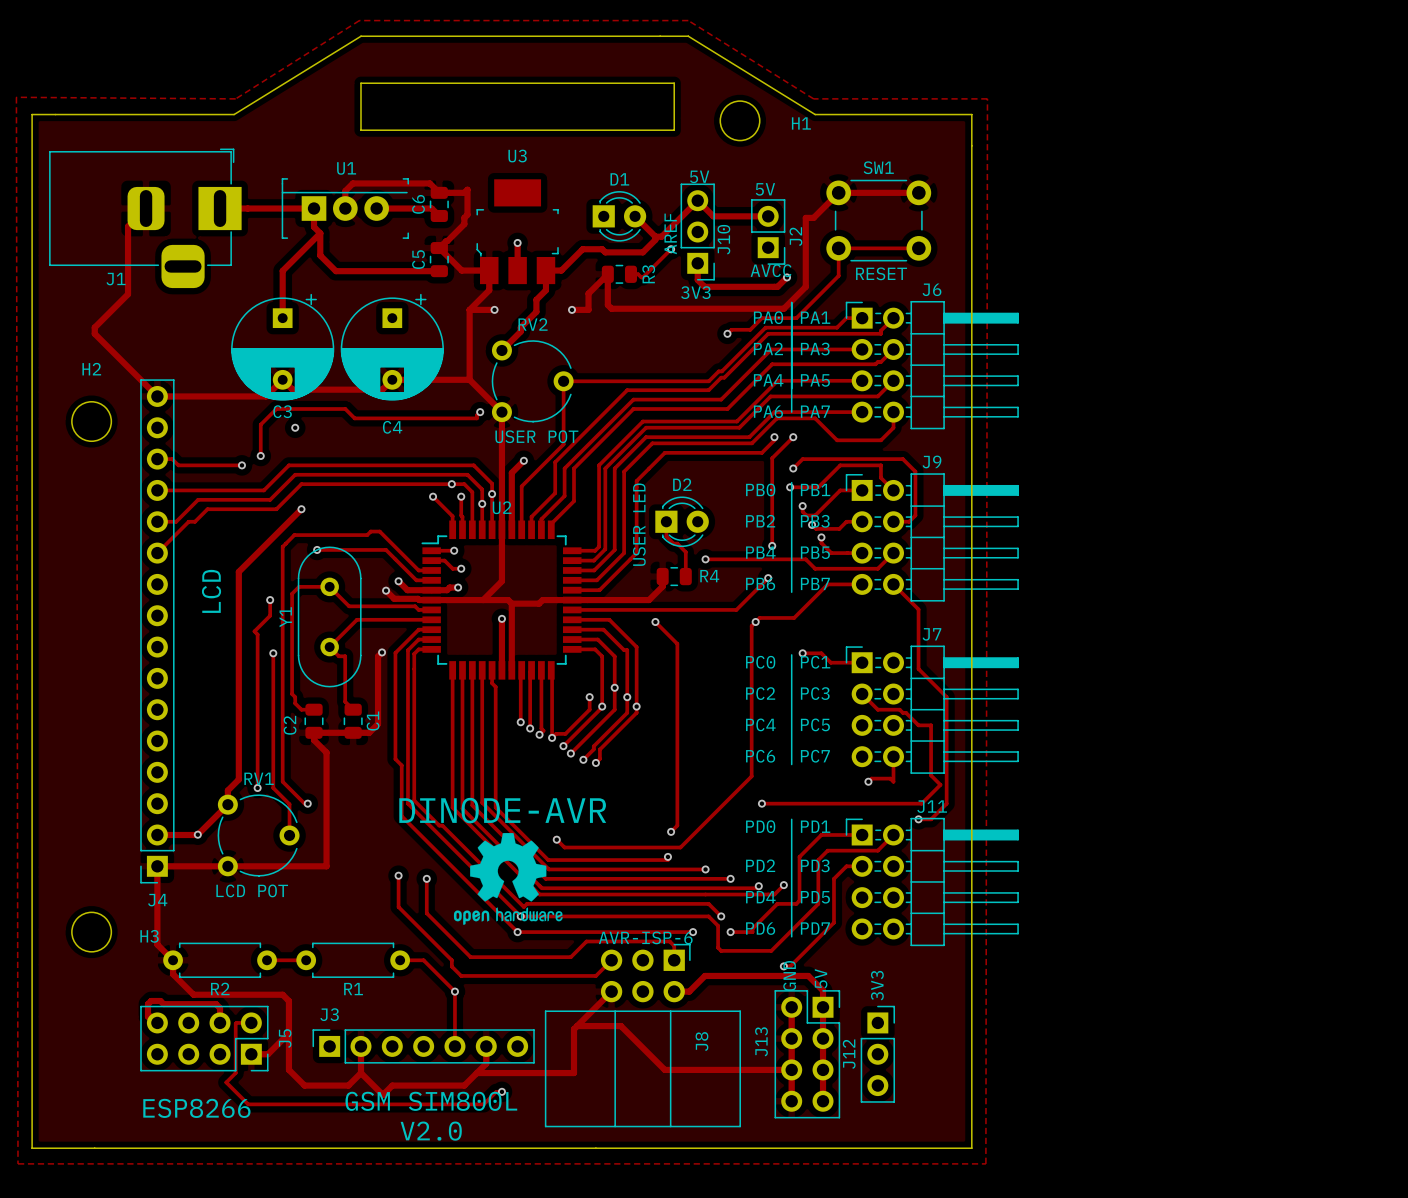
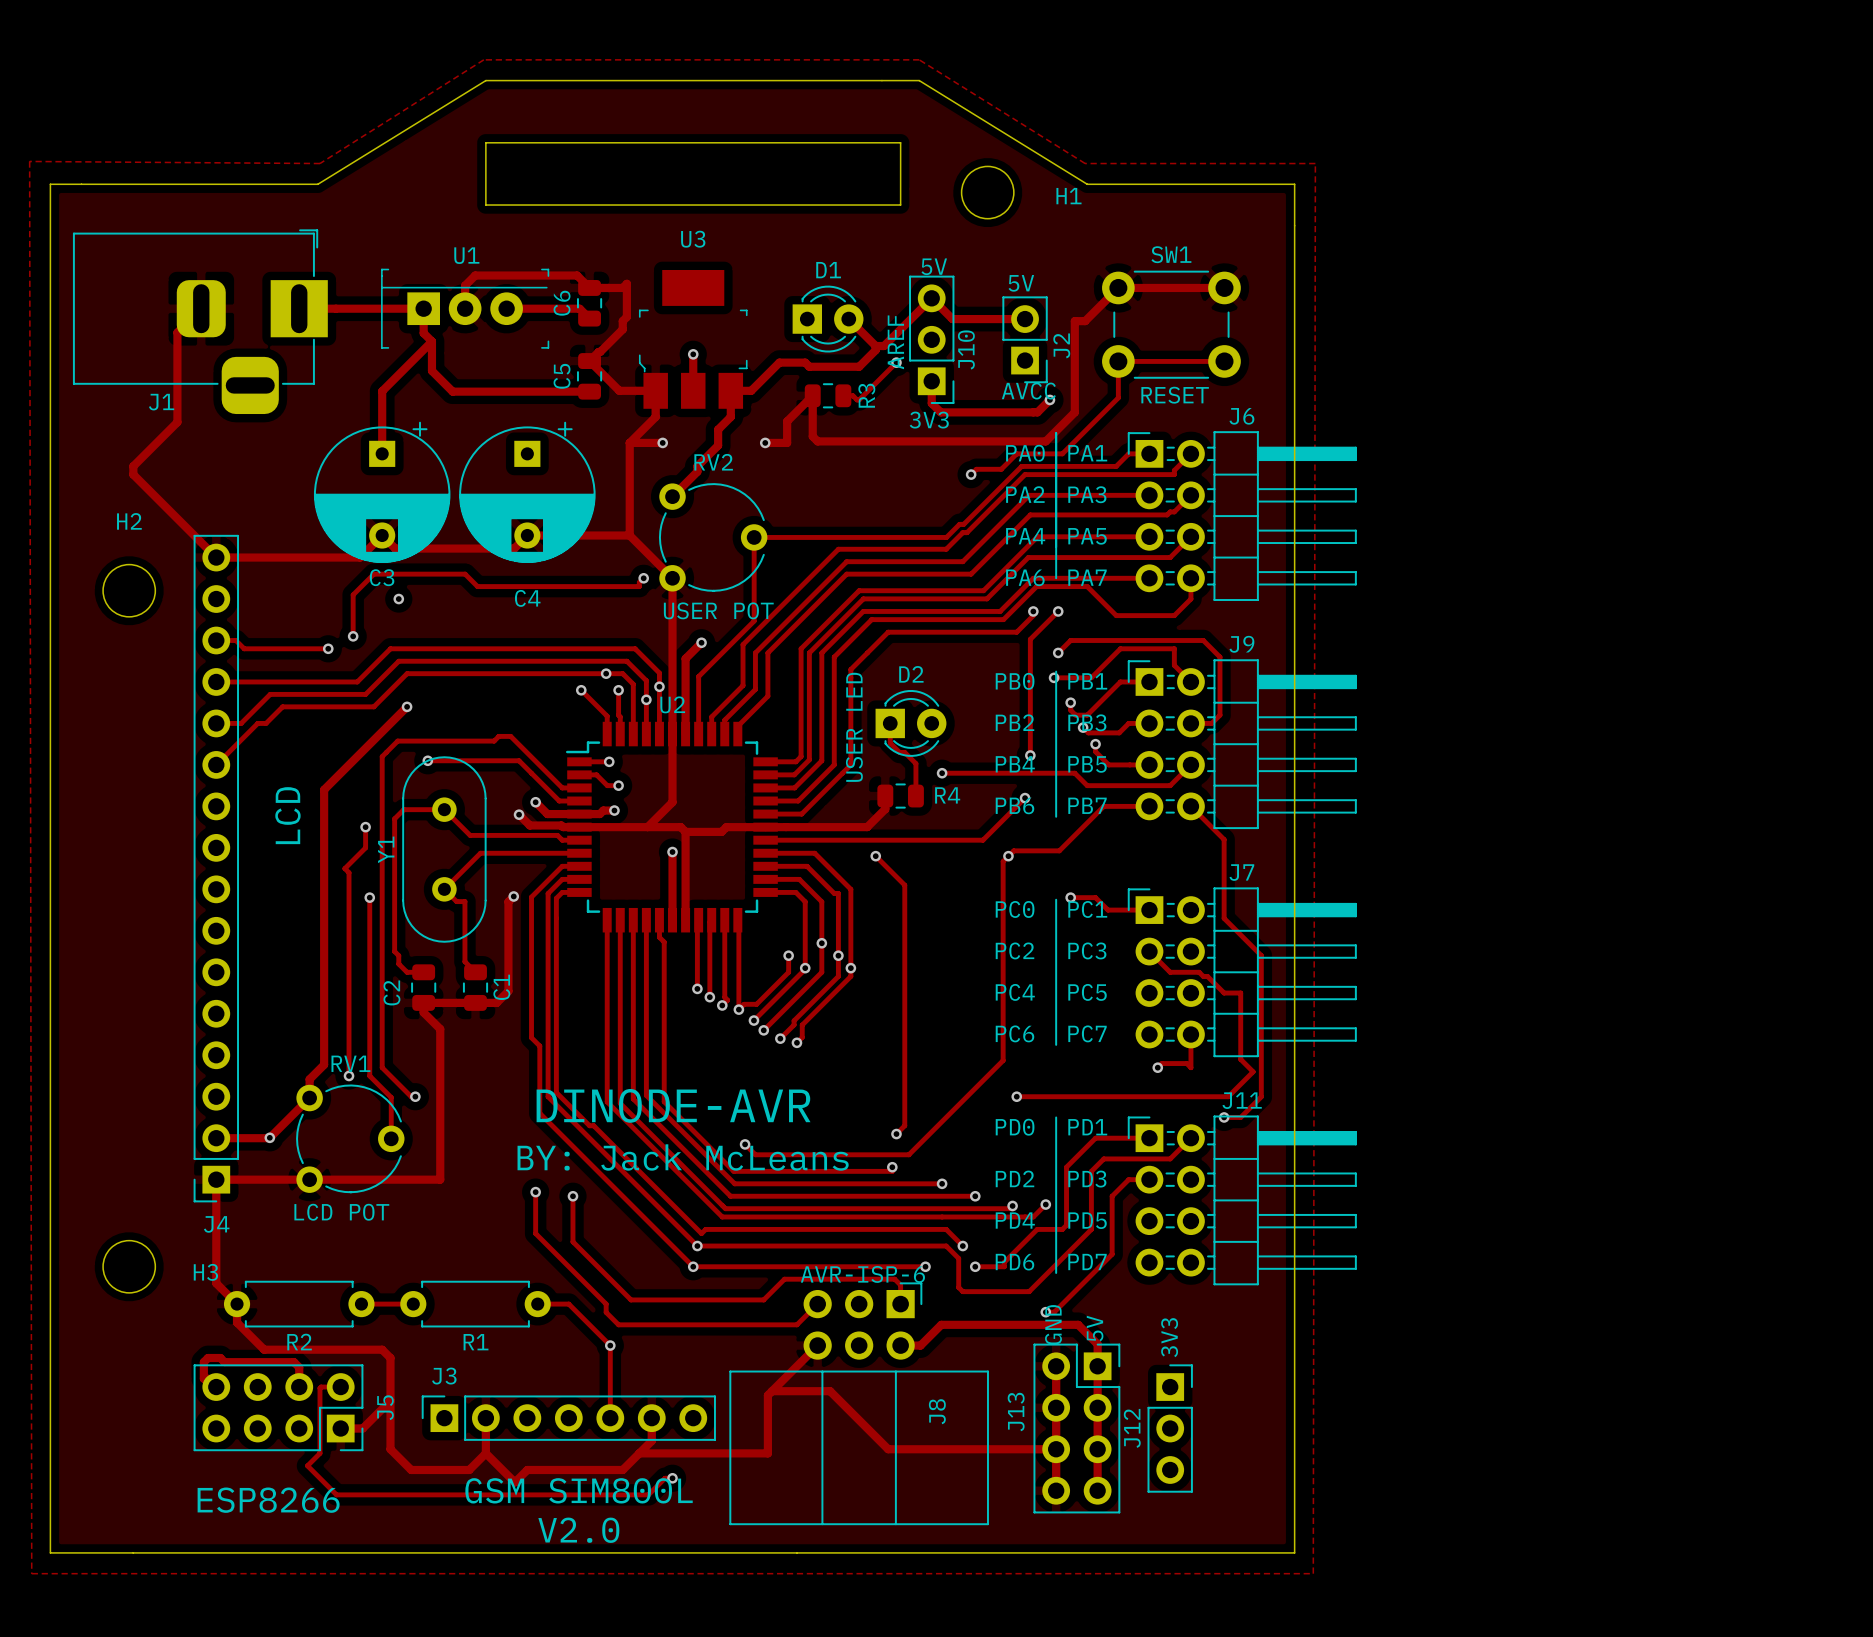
drawing: [453, 833, 563, 925] -> none
text: none -> BY: Jack McLeans (683, 1157)

